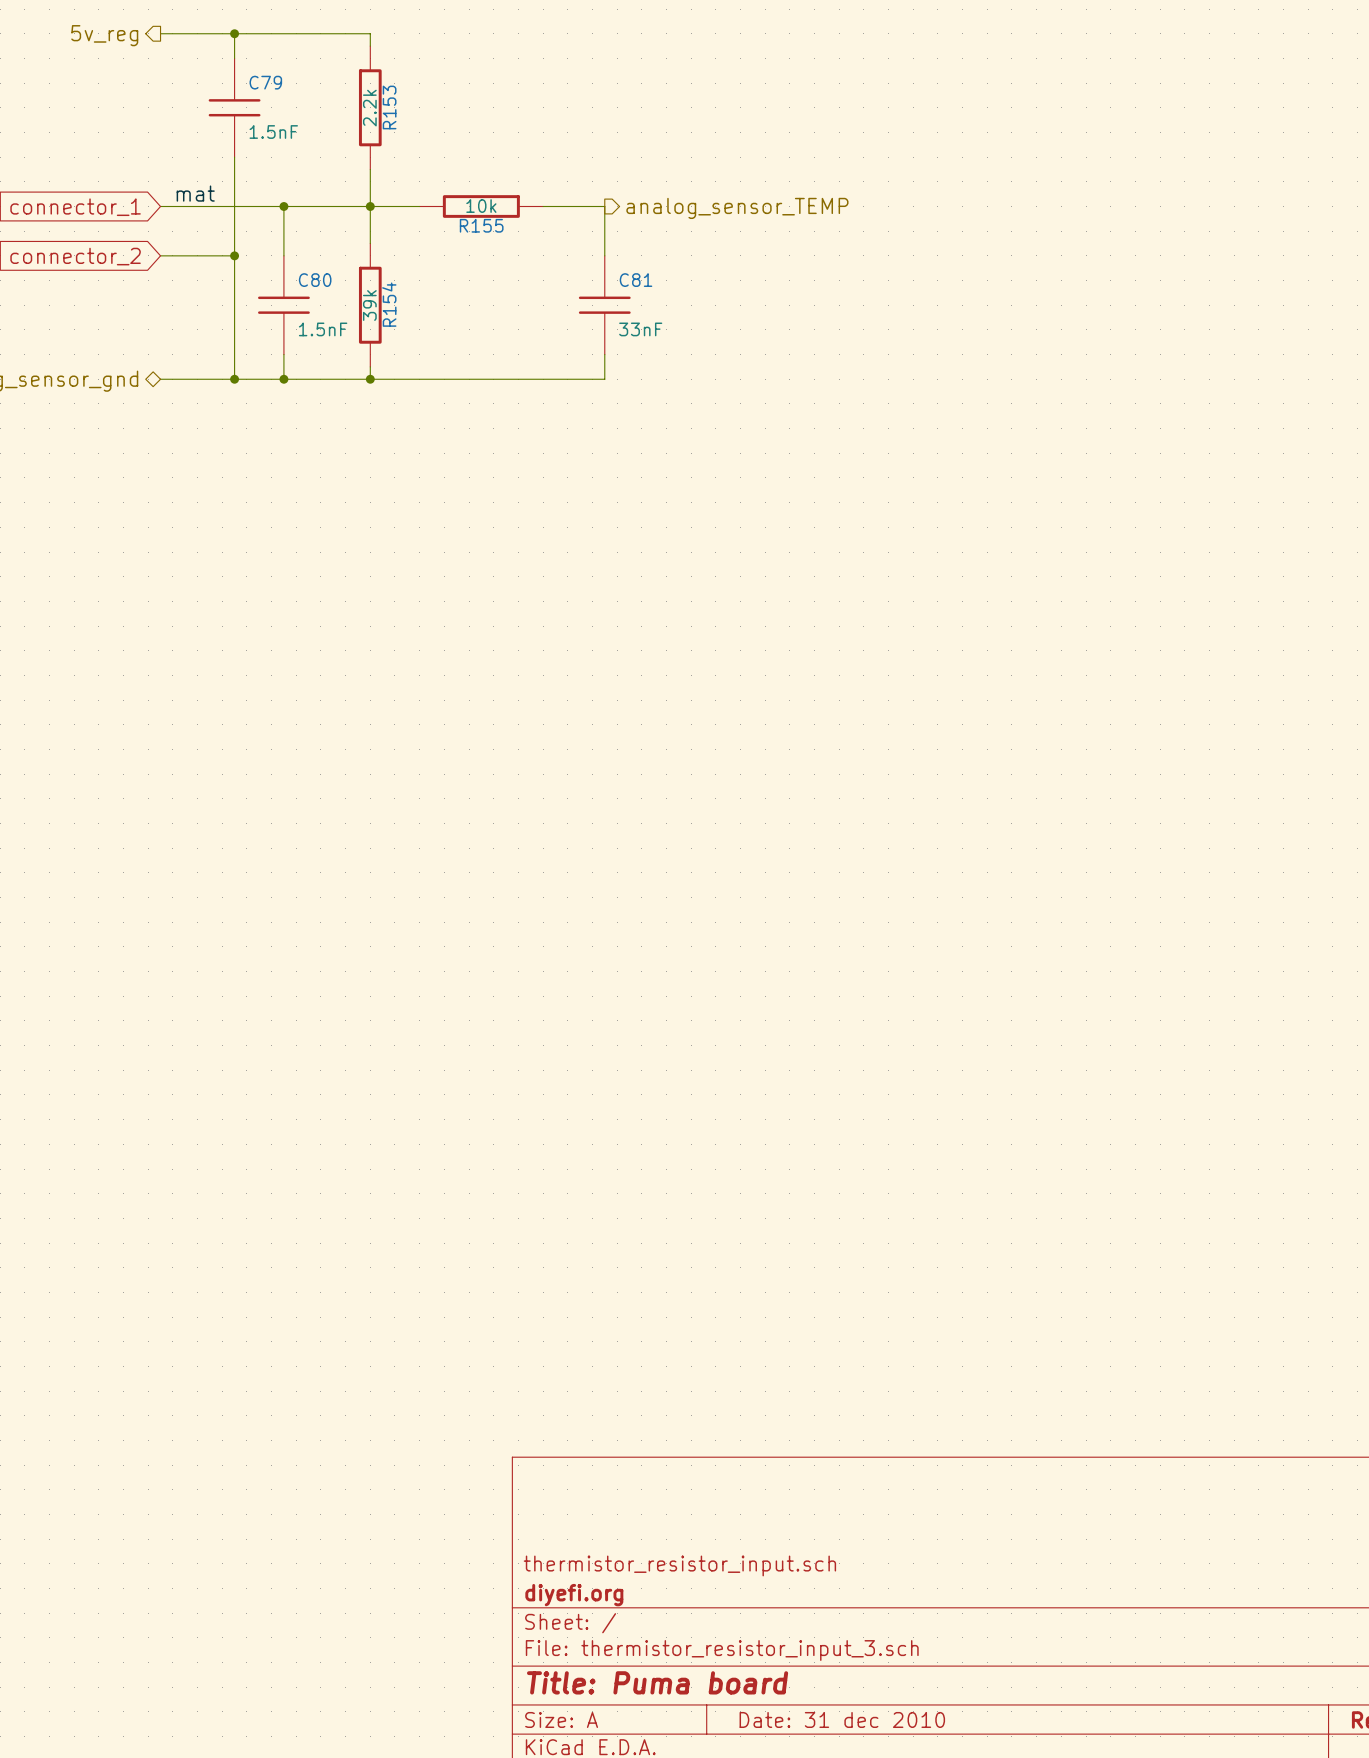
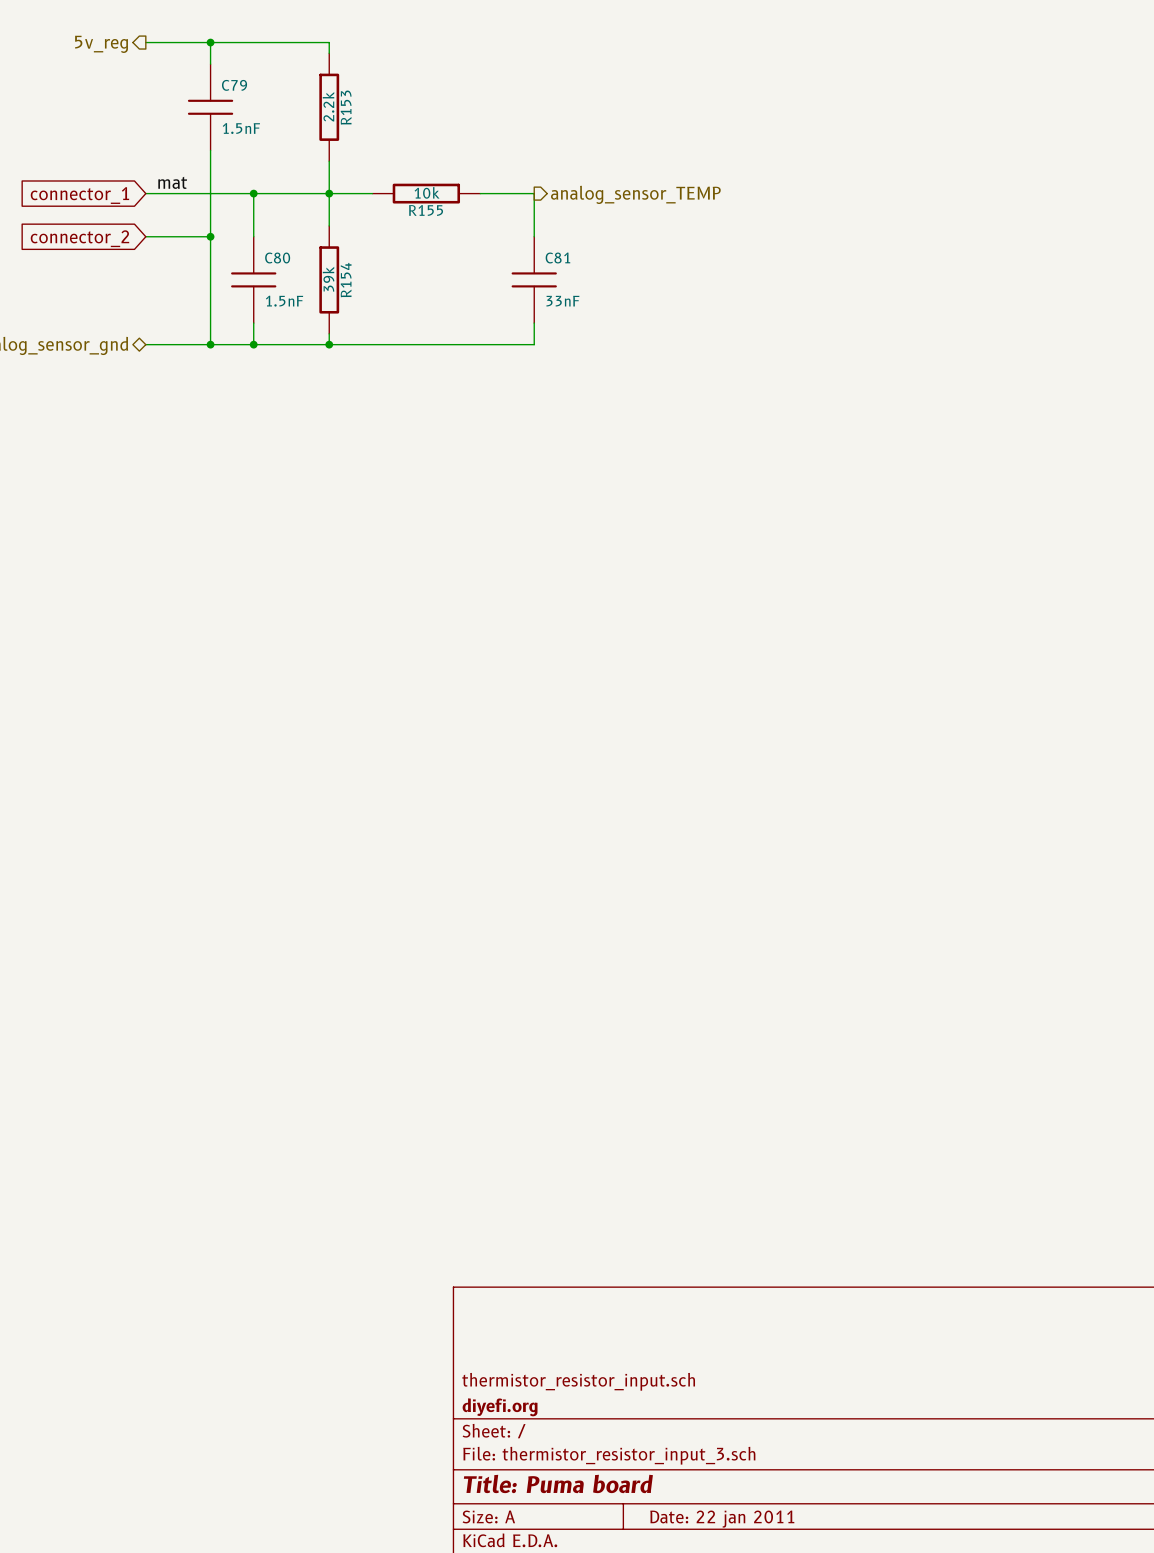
title block: Date: 31 dec 2010 (842, 1719) -> Date: 22 jan 2011 (722, 1519)

